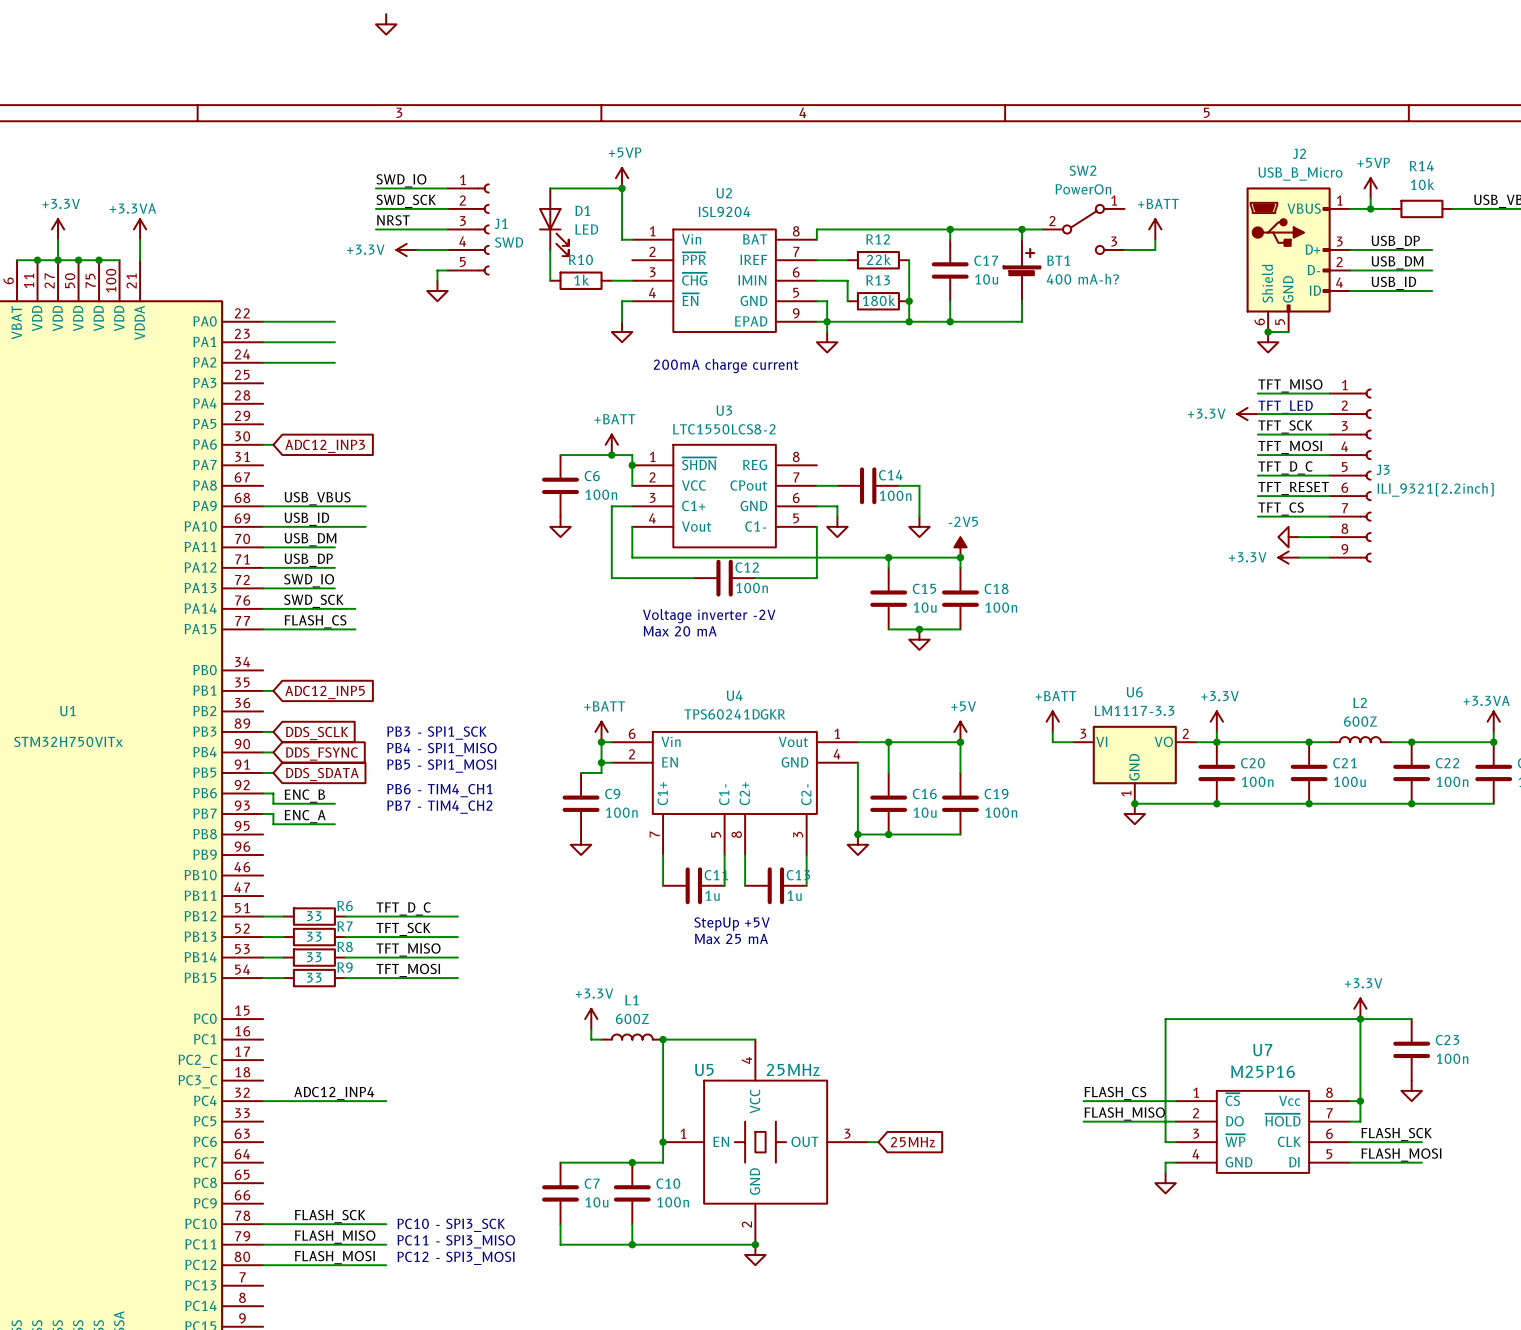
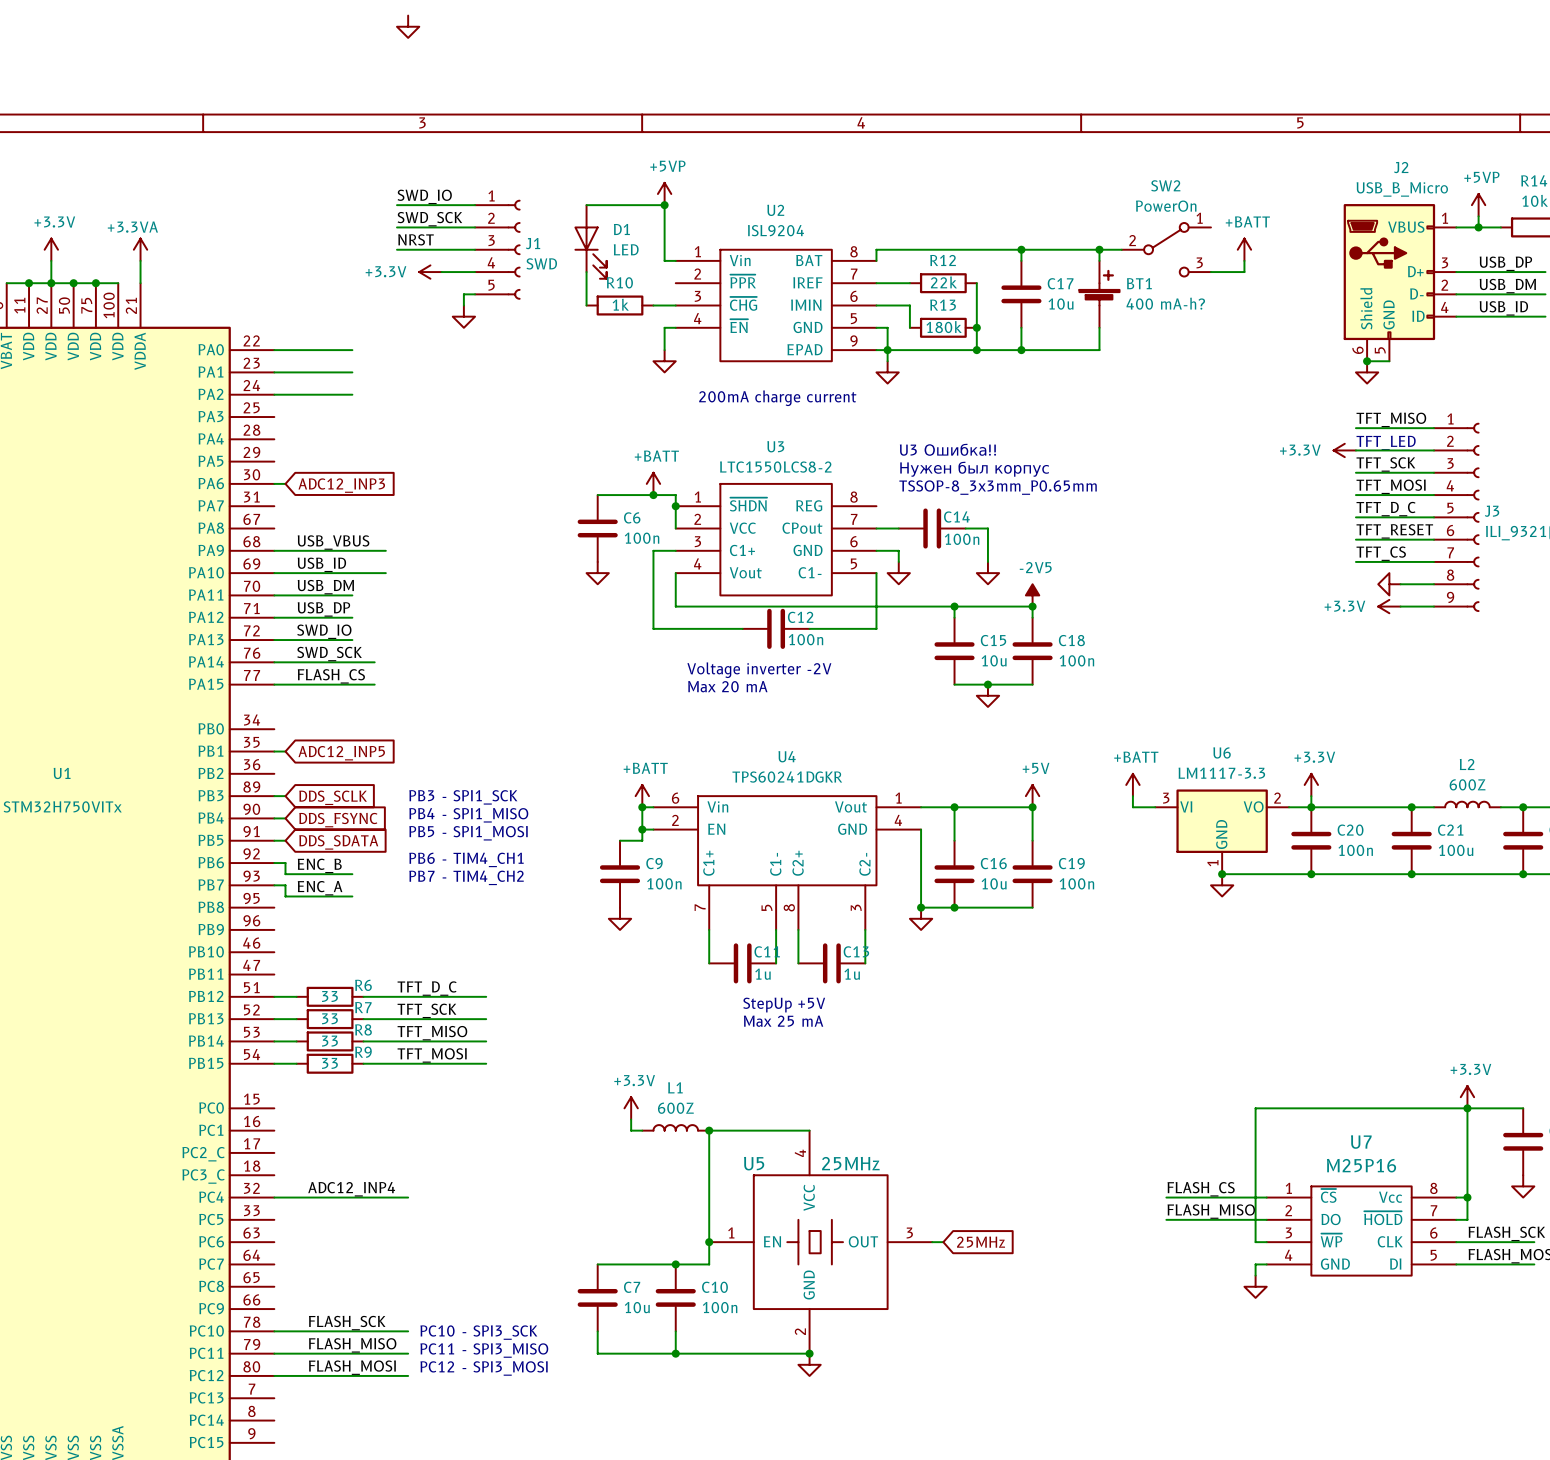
text: none -> U3 Ошибка!! (947, 449)
text: none -> Нужен был корпус (974, 469)
text: none -> TSSOP-8_3x3mm_P0.65mm (998, 487)

